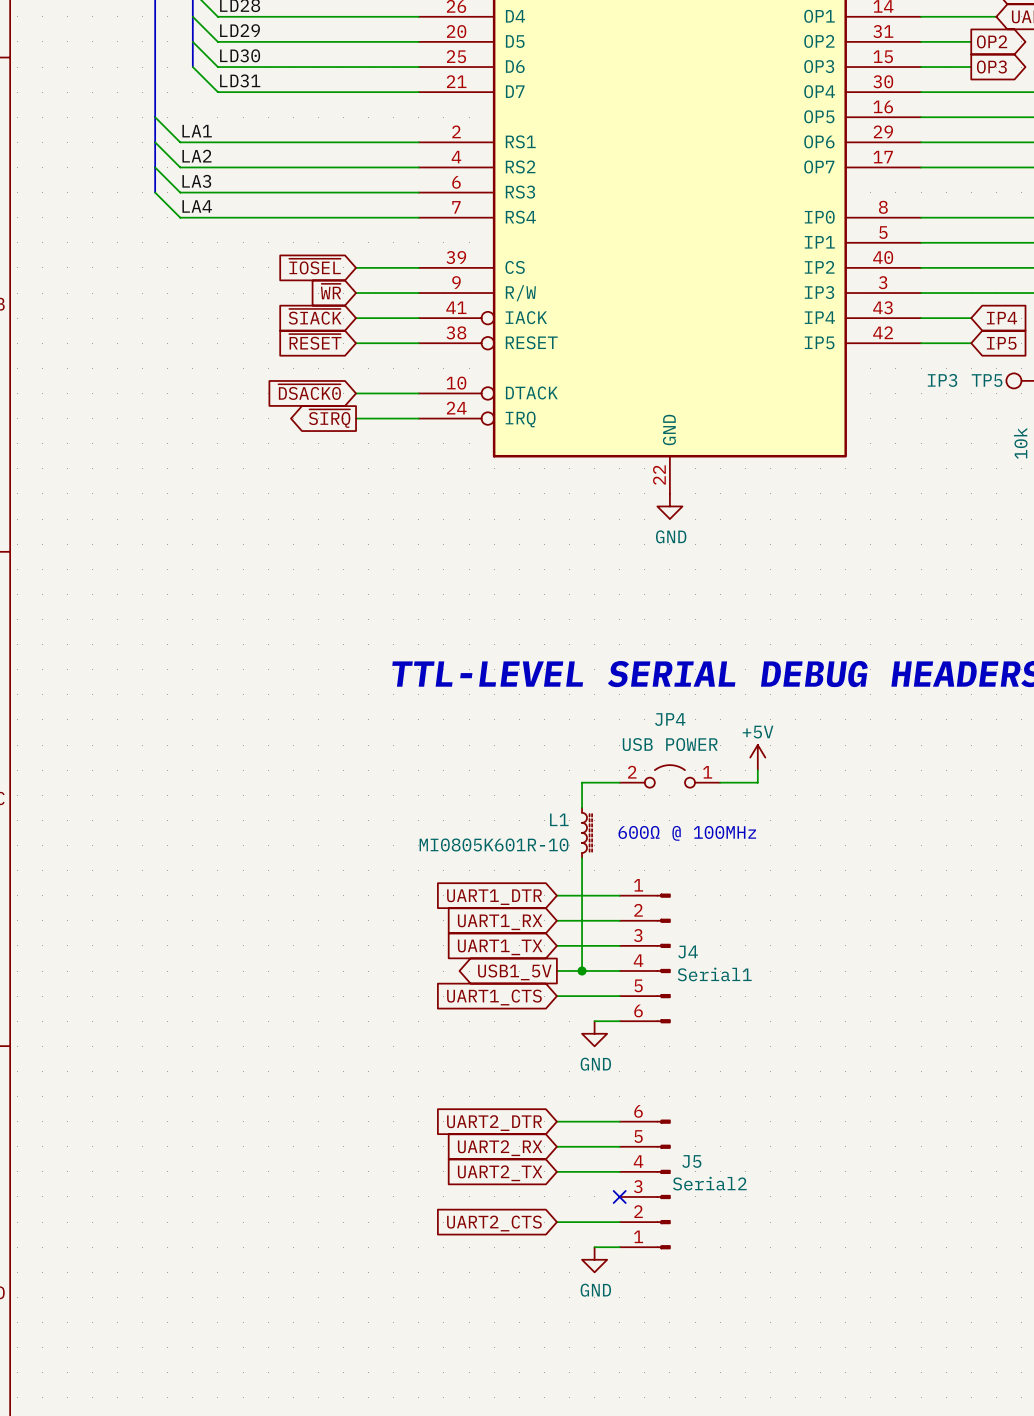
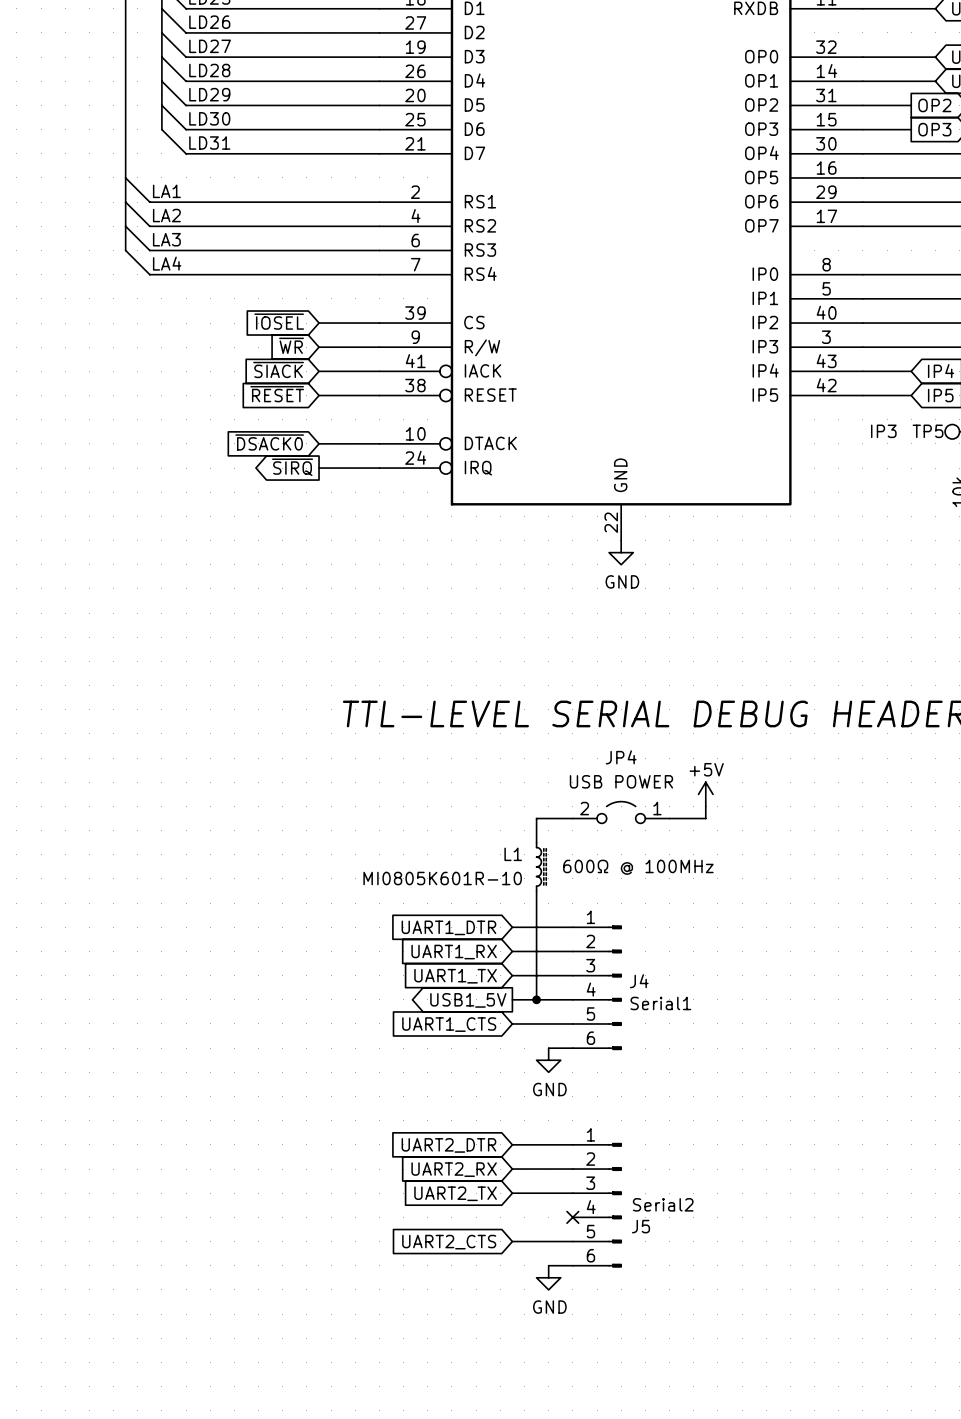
J5 flip: as is (663, 1184) -> up-down (615, 1205)

